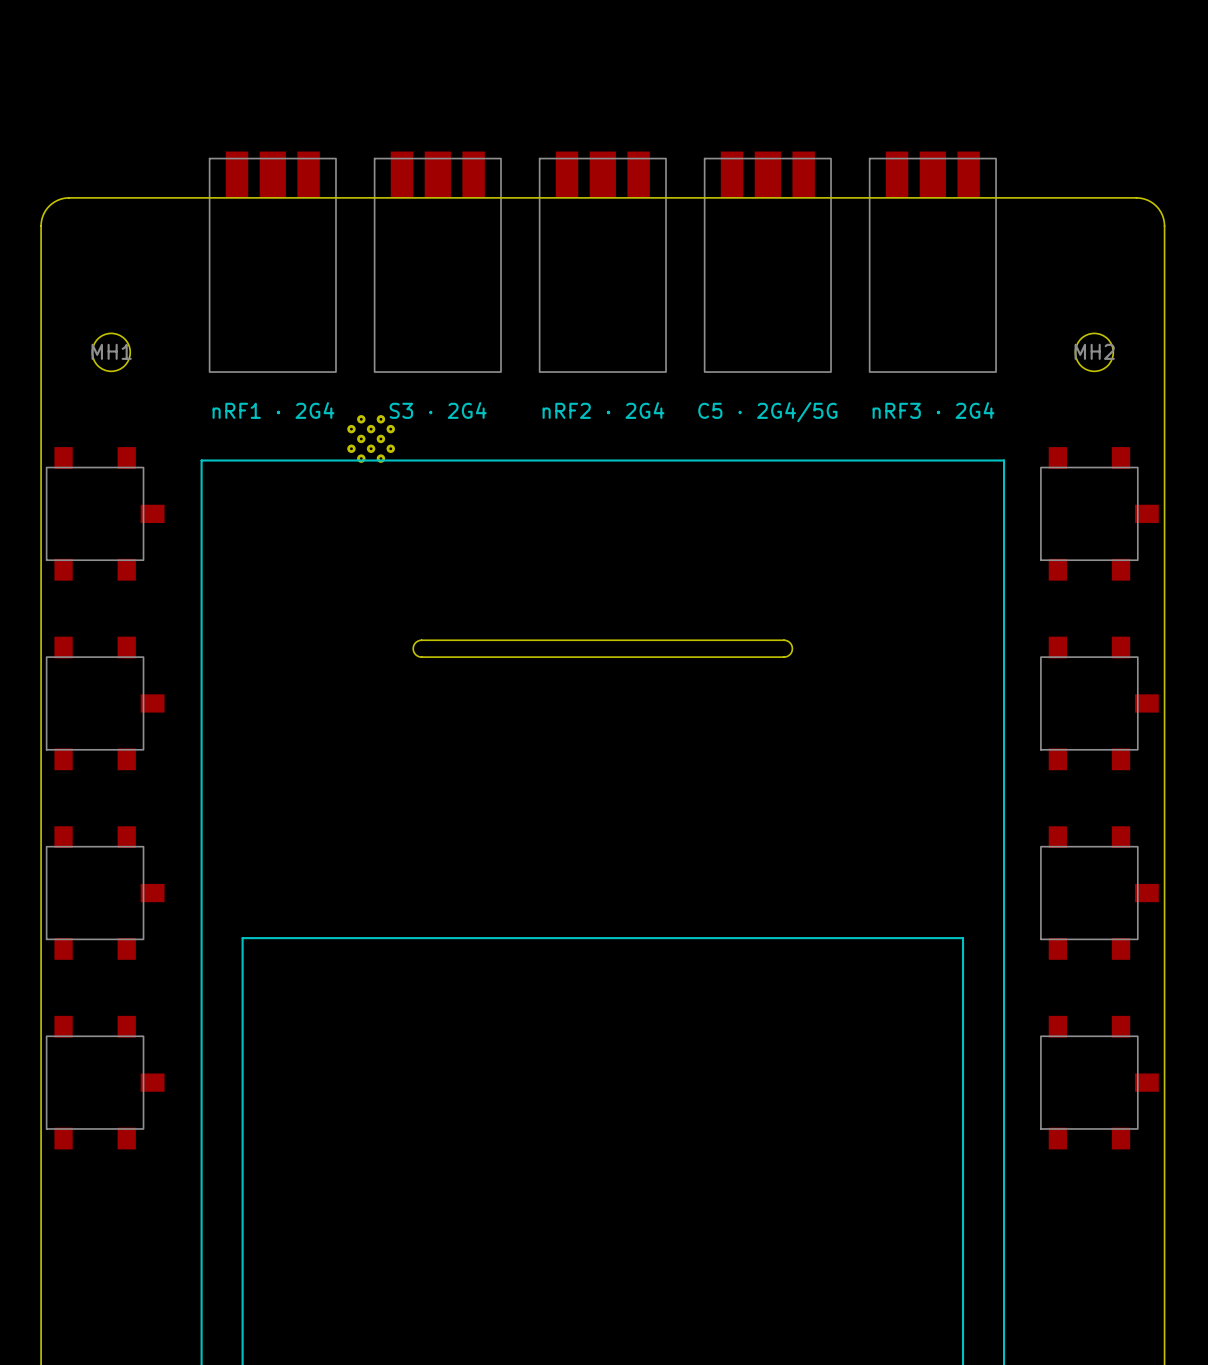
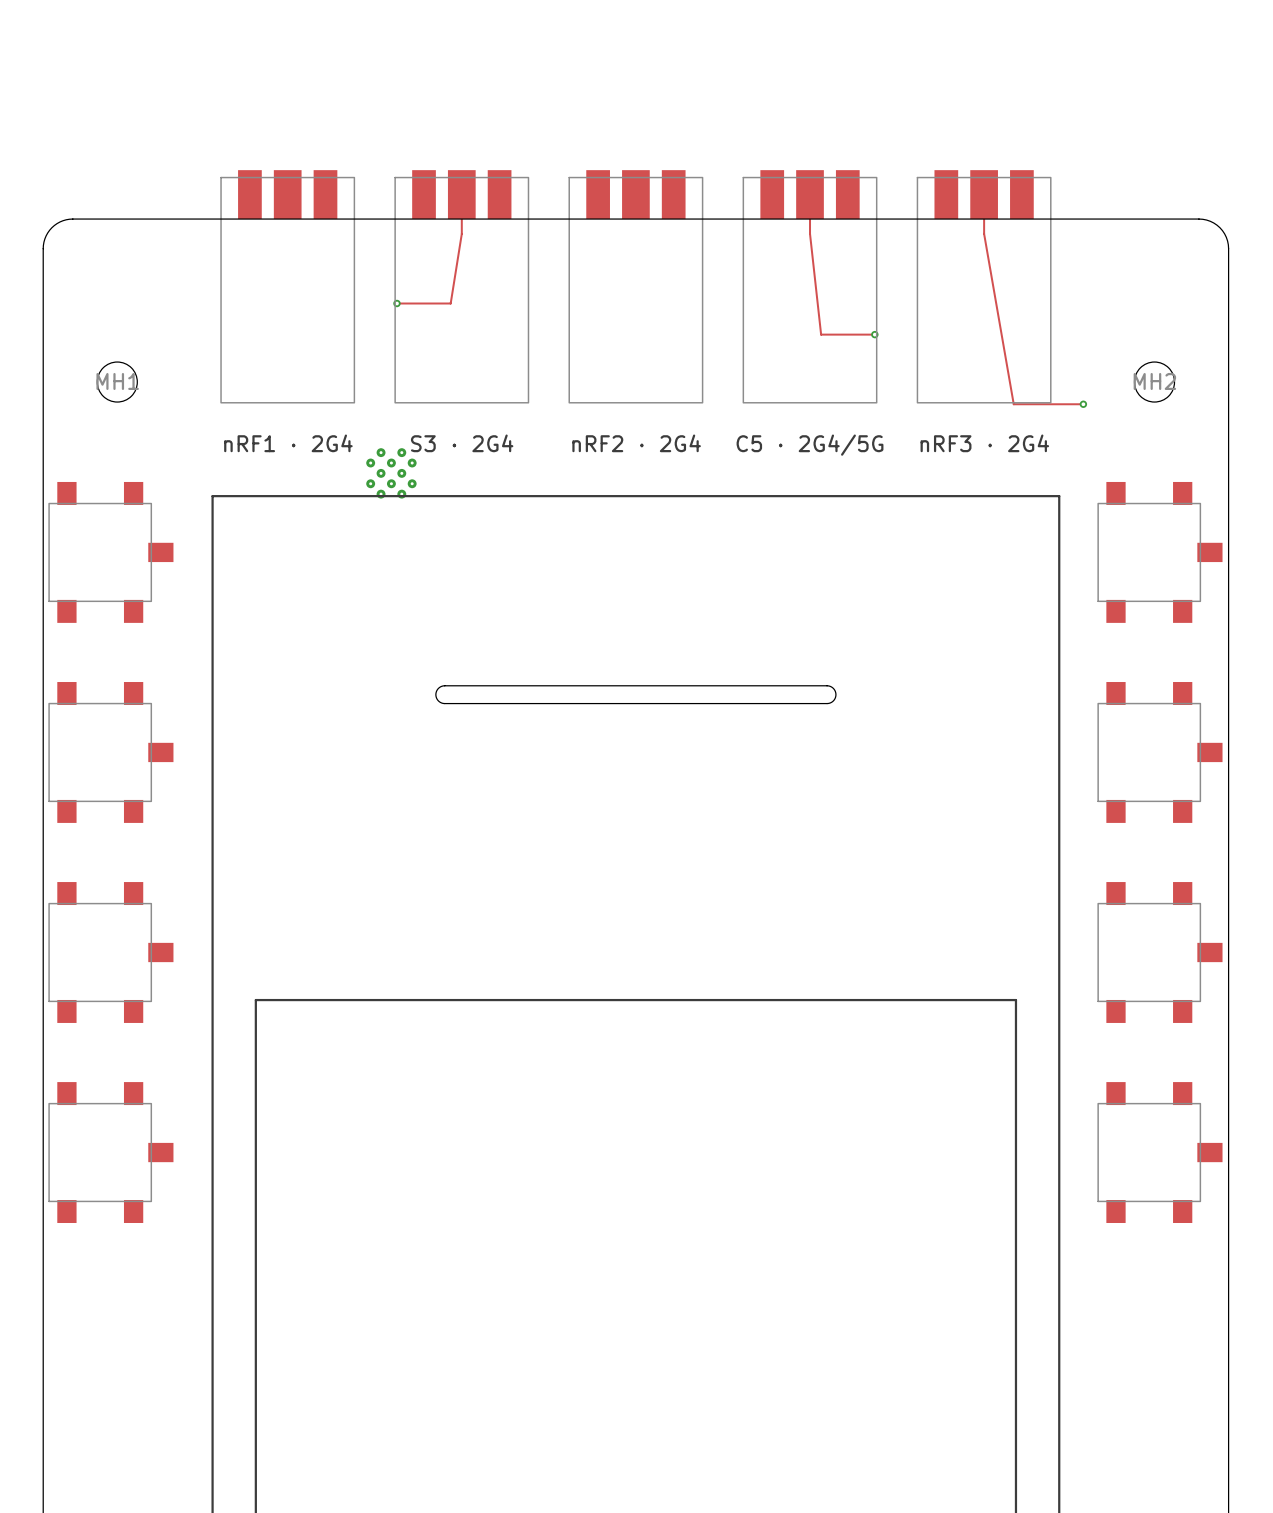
track: none -> (461, 194) (461, 233) (450, 303) (396, 303)
track: none -> (810, 194) (810, 233) (821, 334) (874, 334)
track: none -> (984, 194) (984, 233) (1013, 404) (1083, 404)
via: none -> (396, 303)
via: none -> (874, 334)
via: none -> (1083, 404)

